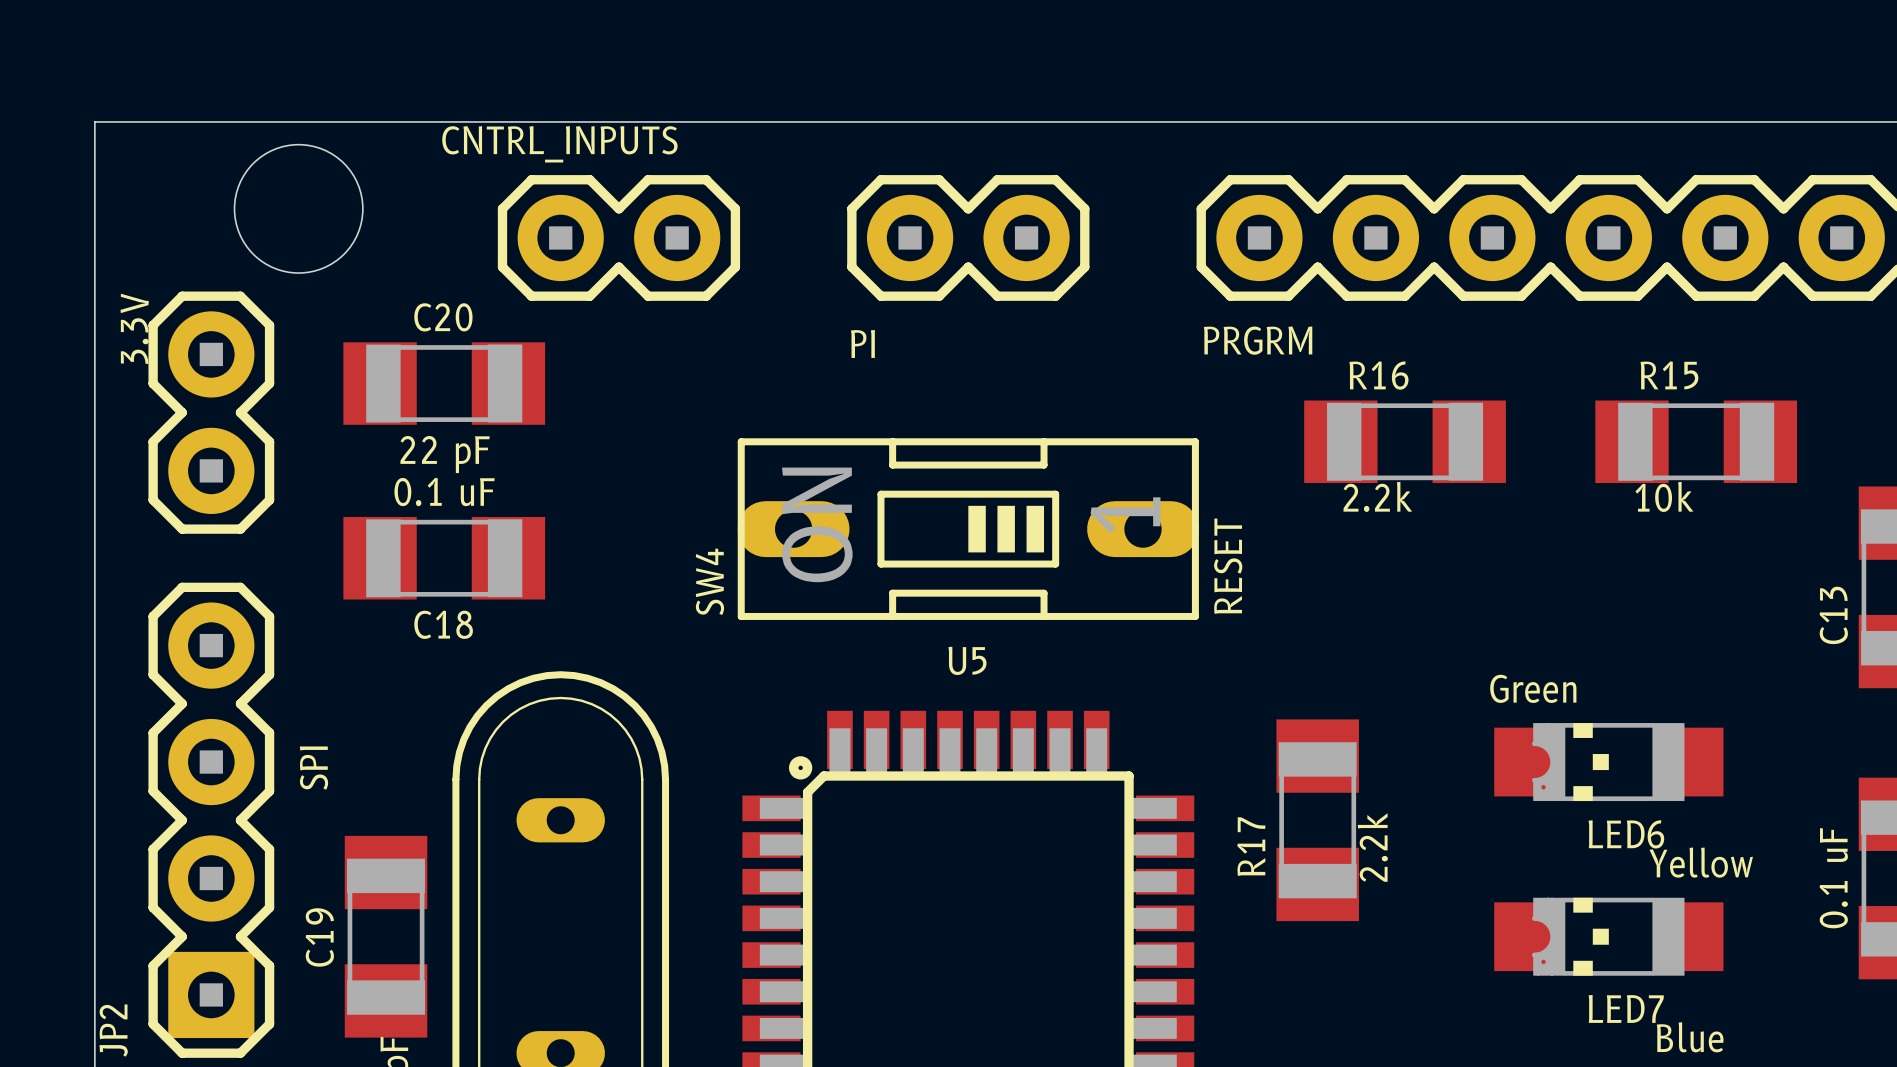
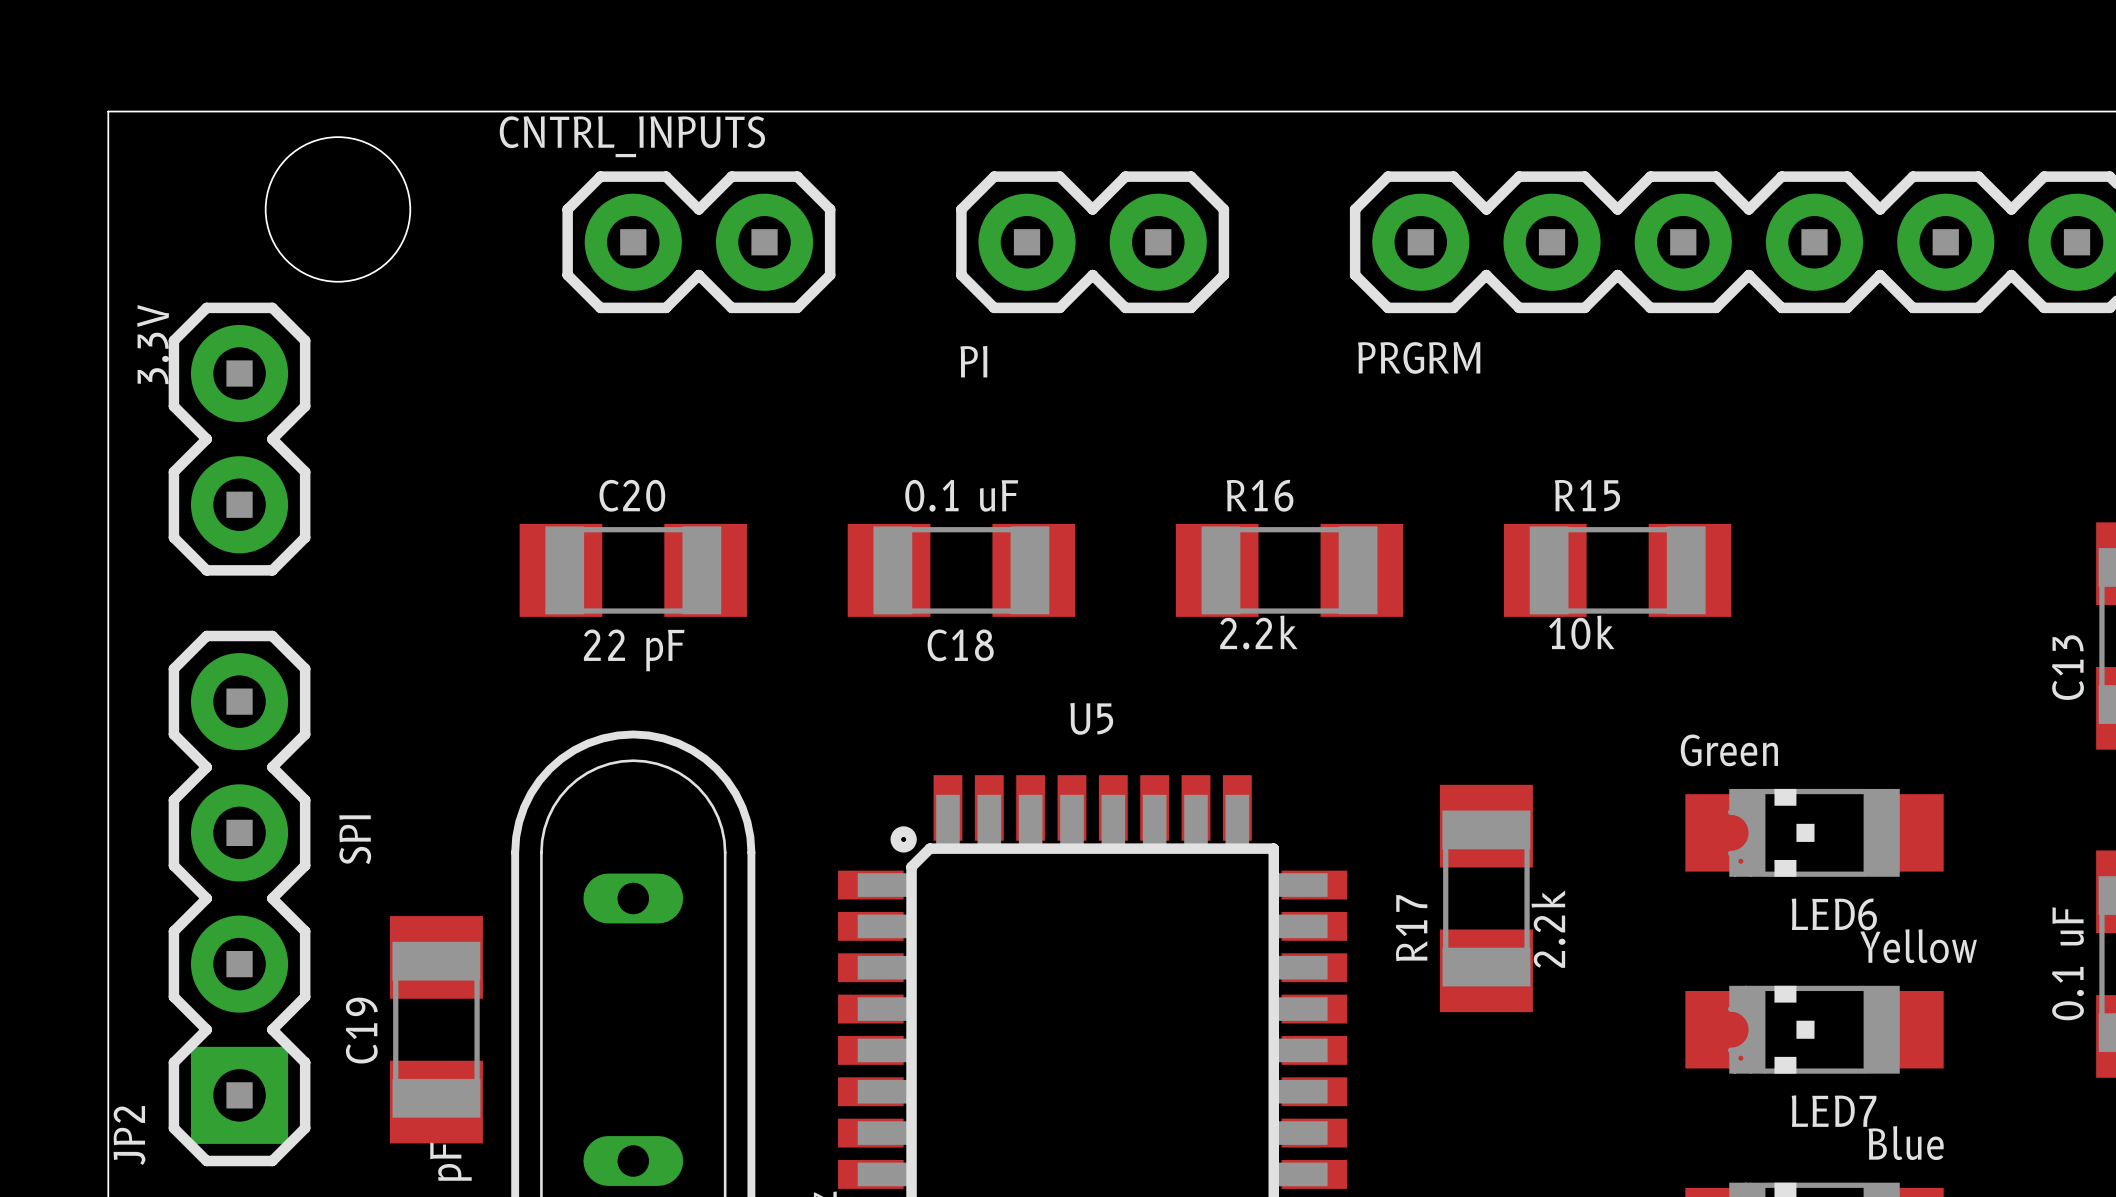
C20 position: (444, 383) -> (633, 570)
R16 position: (1405, 441) -> (1289, 570)
R15 position: (1696, 441) -> (1617, 570)
SW4: RESET (968, 529) -> none
C18 position: (444, 558) -> (961, 570)

